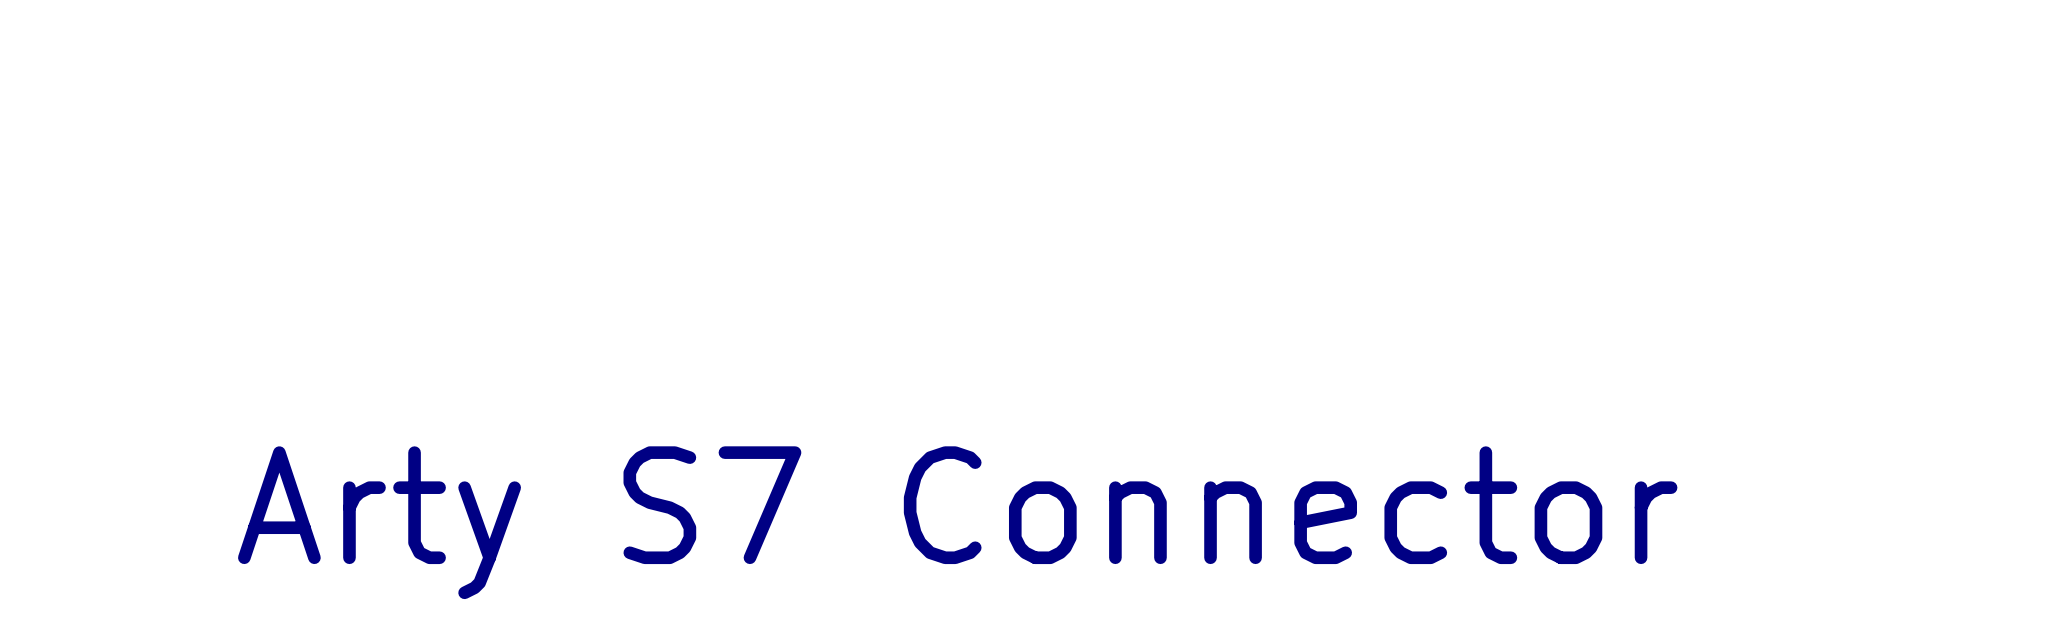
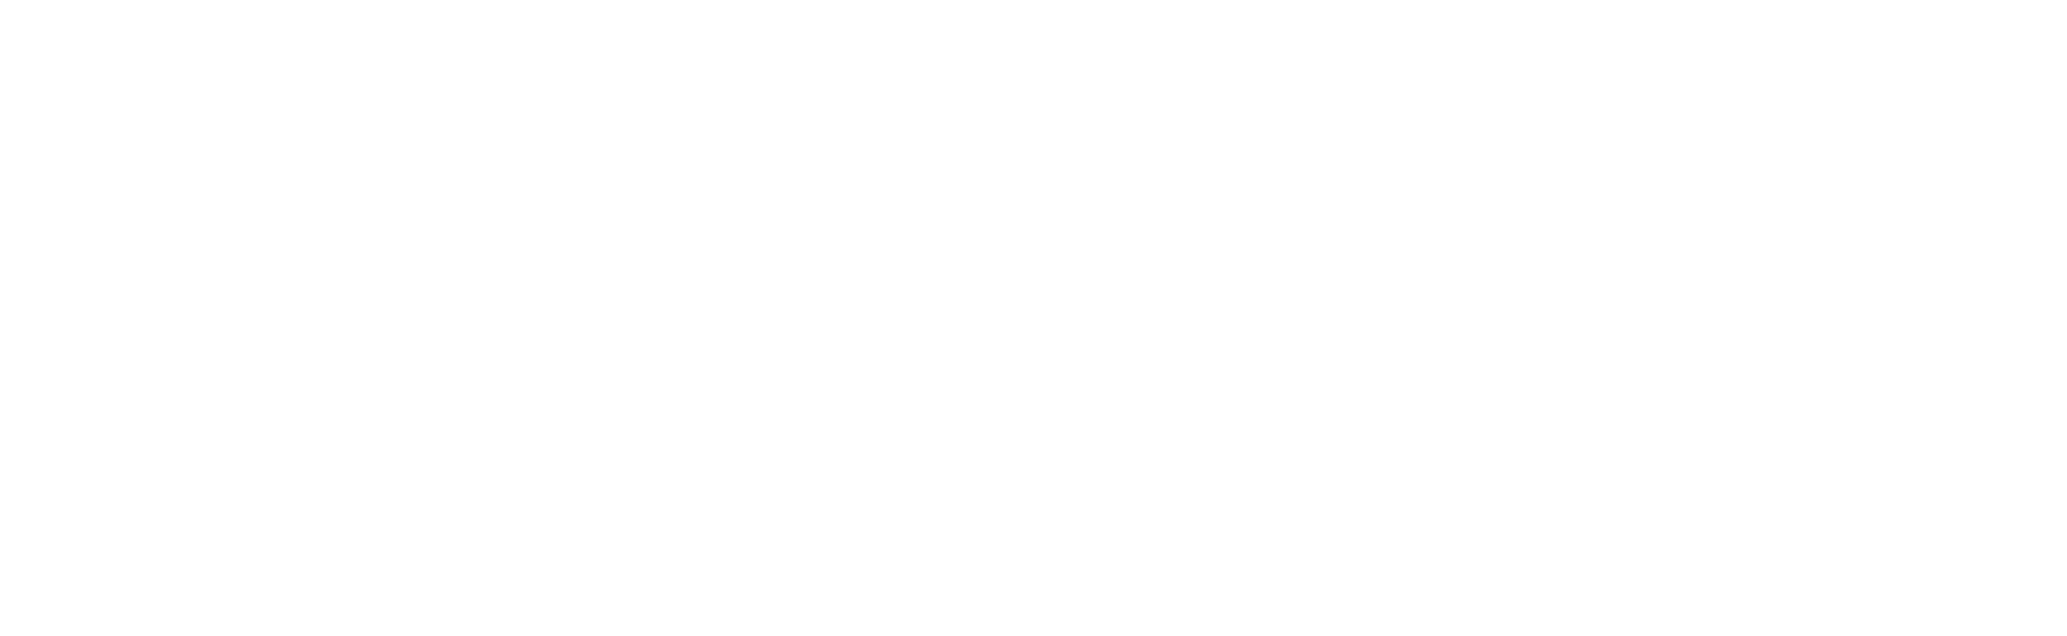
text: Arty S7 Connector (957, 522) -> none

